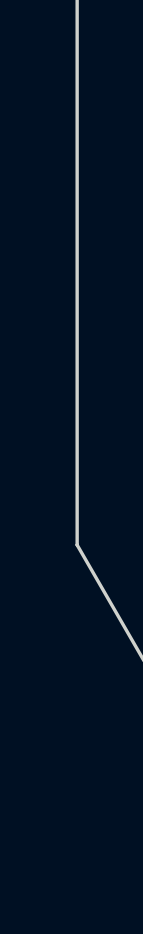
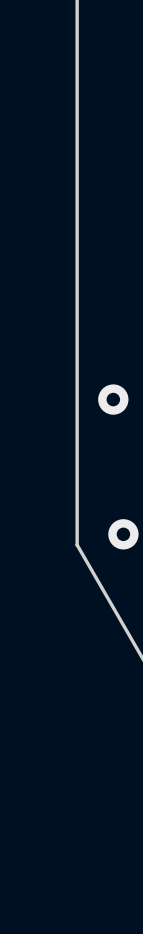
via: none -> (113, 399)
via: none -> (123, 534)

